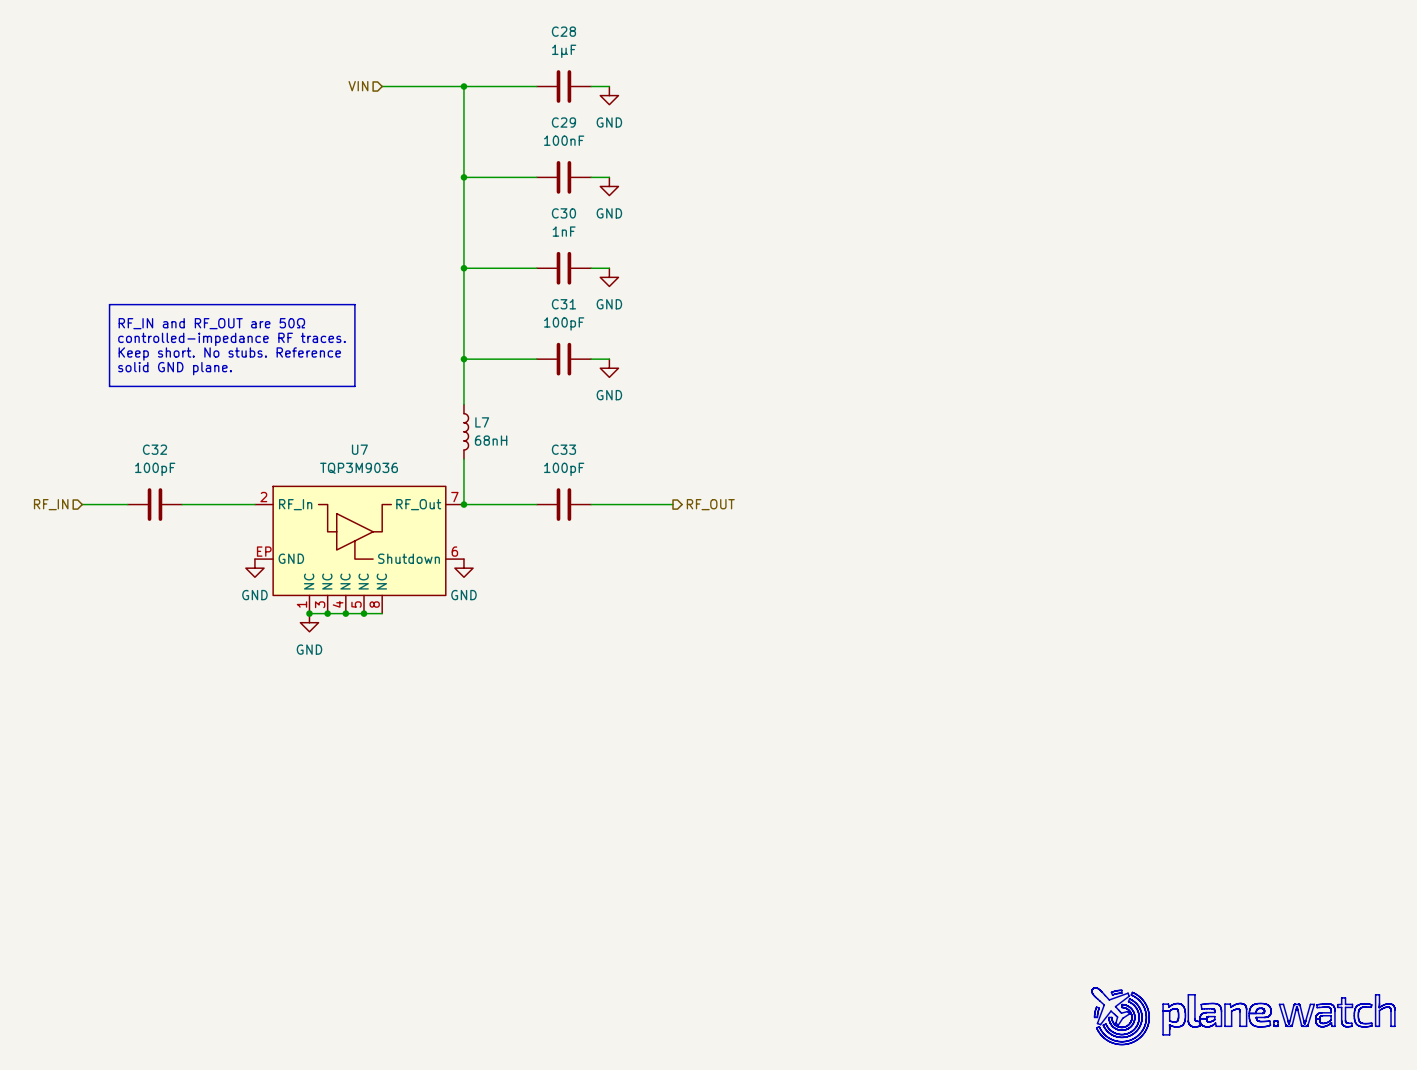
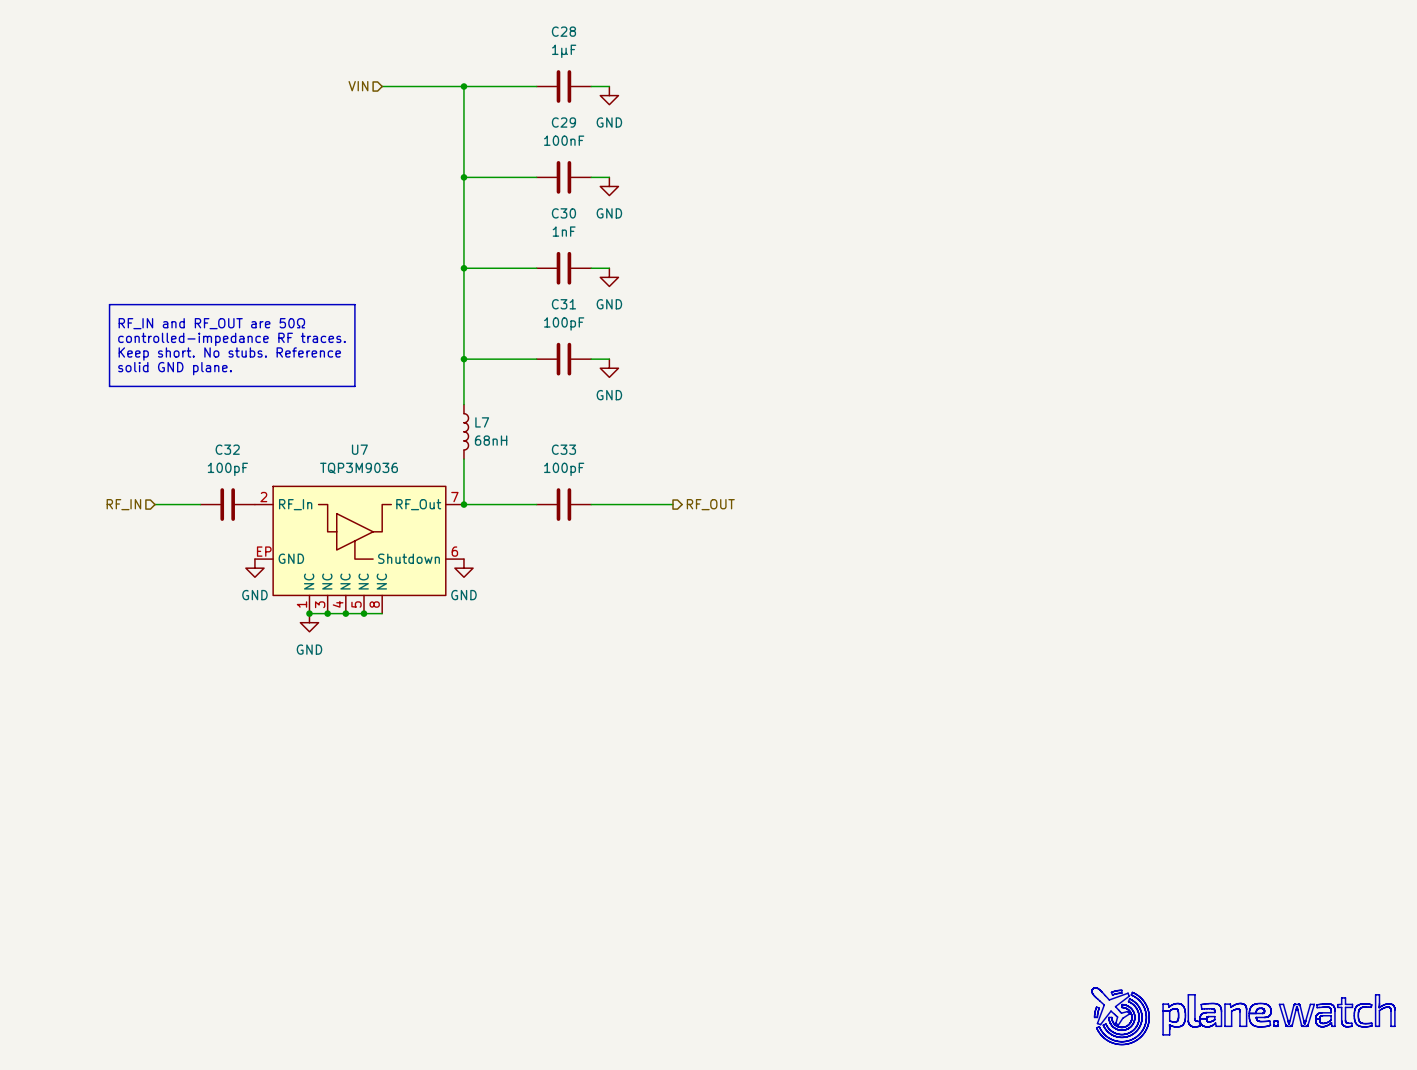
hierarchical label position: RF_IN (51, 504) -> RF_IN (123, 504)
wire: (82, 504) (127, 504) -> none
C32 position: (154, 504) -> (227, 504)

